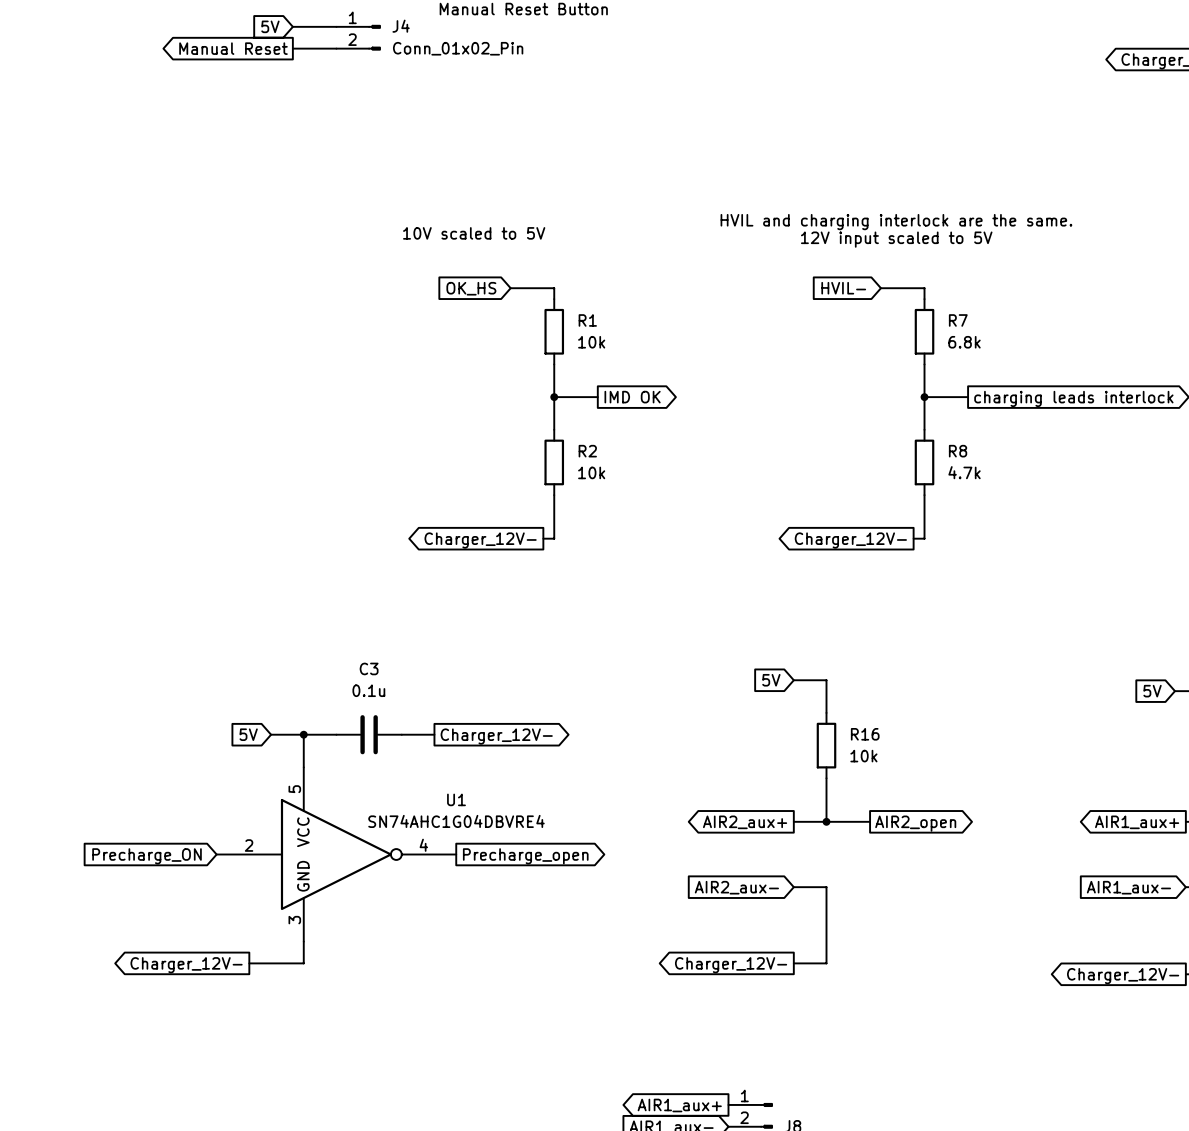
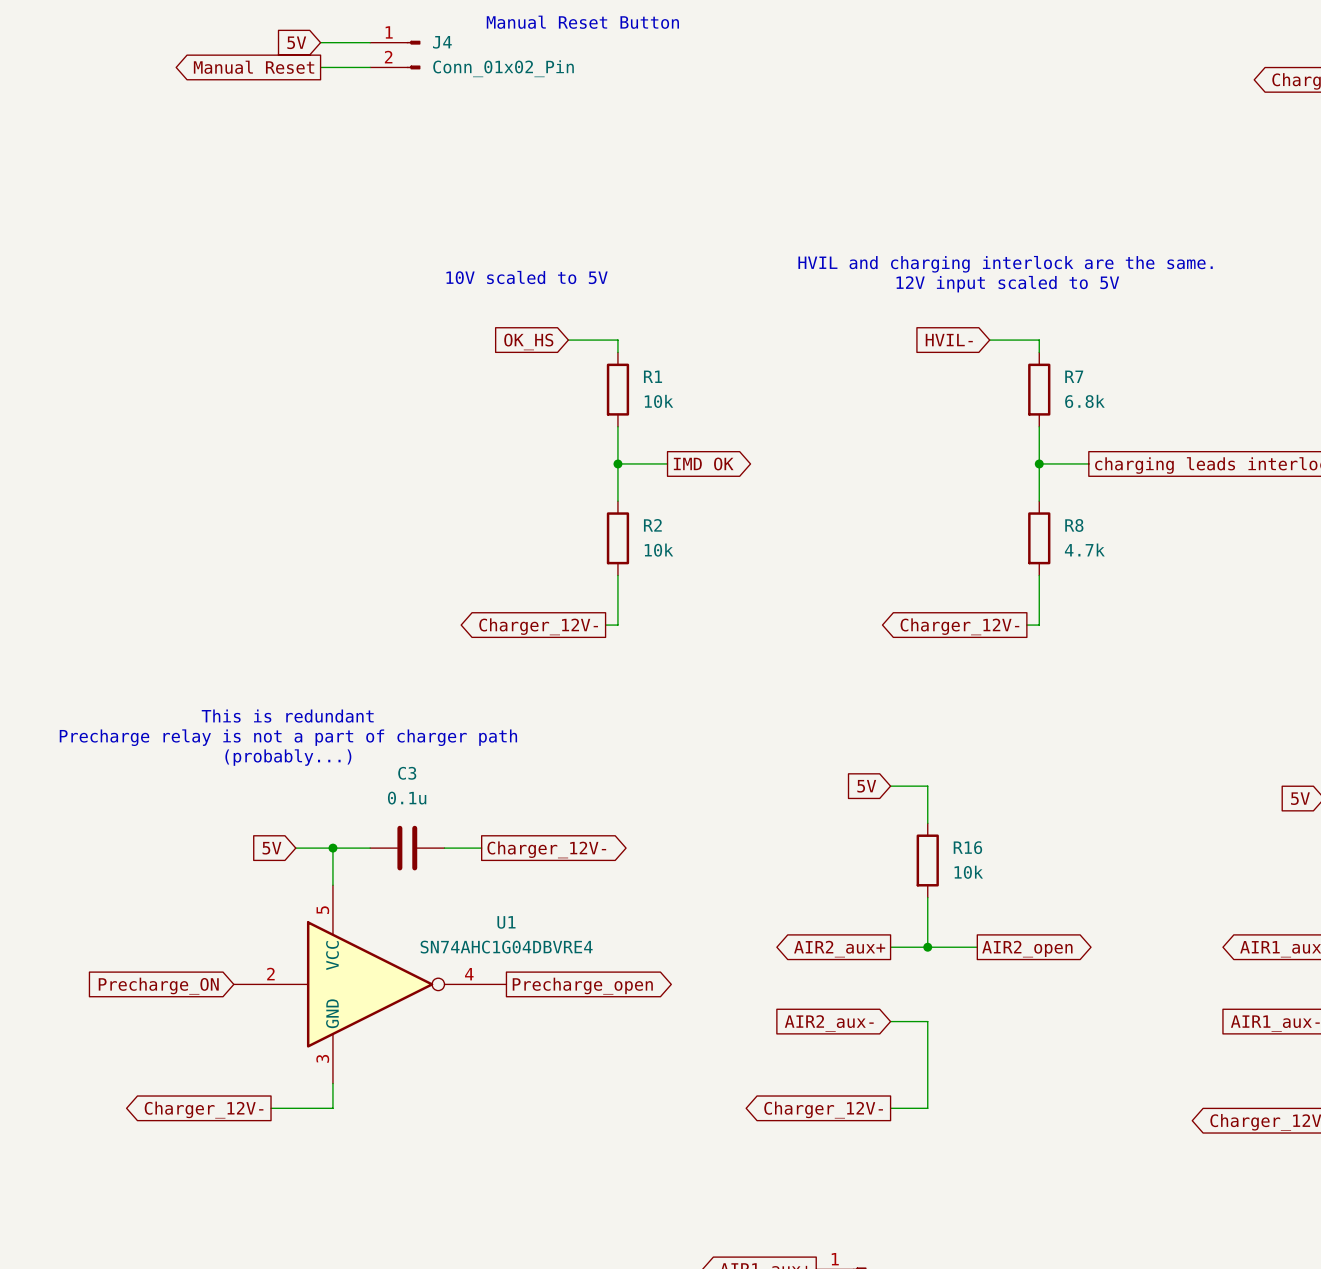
text: none -> This is redundant (287, 716)
text: none -> Precharge relay is not a part of charger path (288, 737)
text: none -> (probably...) (288, 757)

